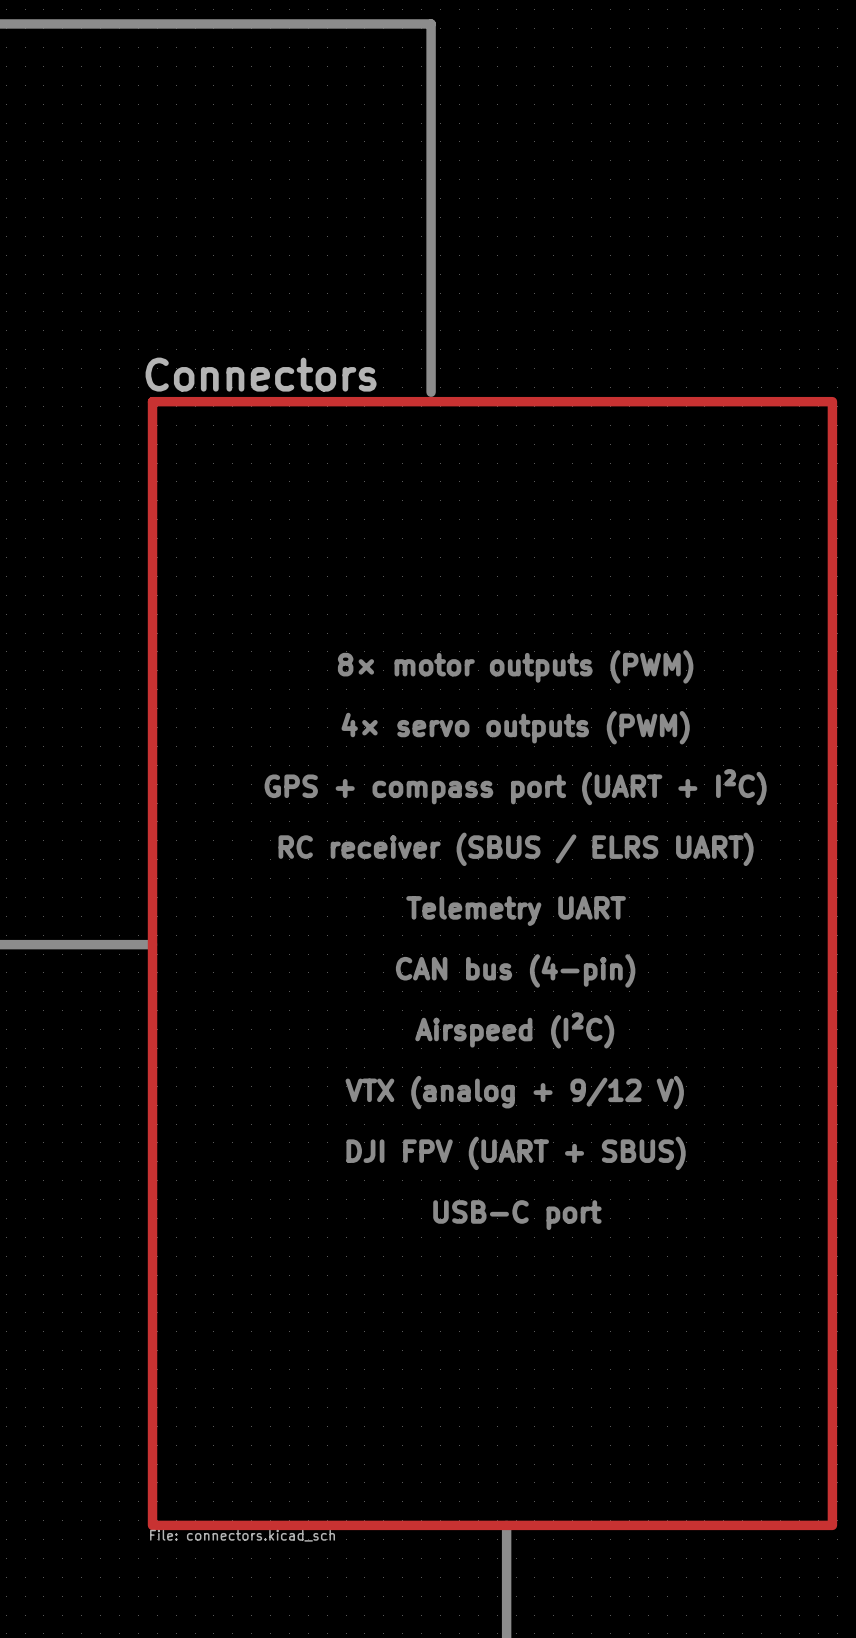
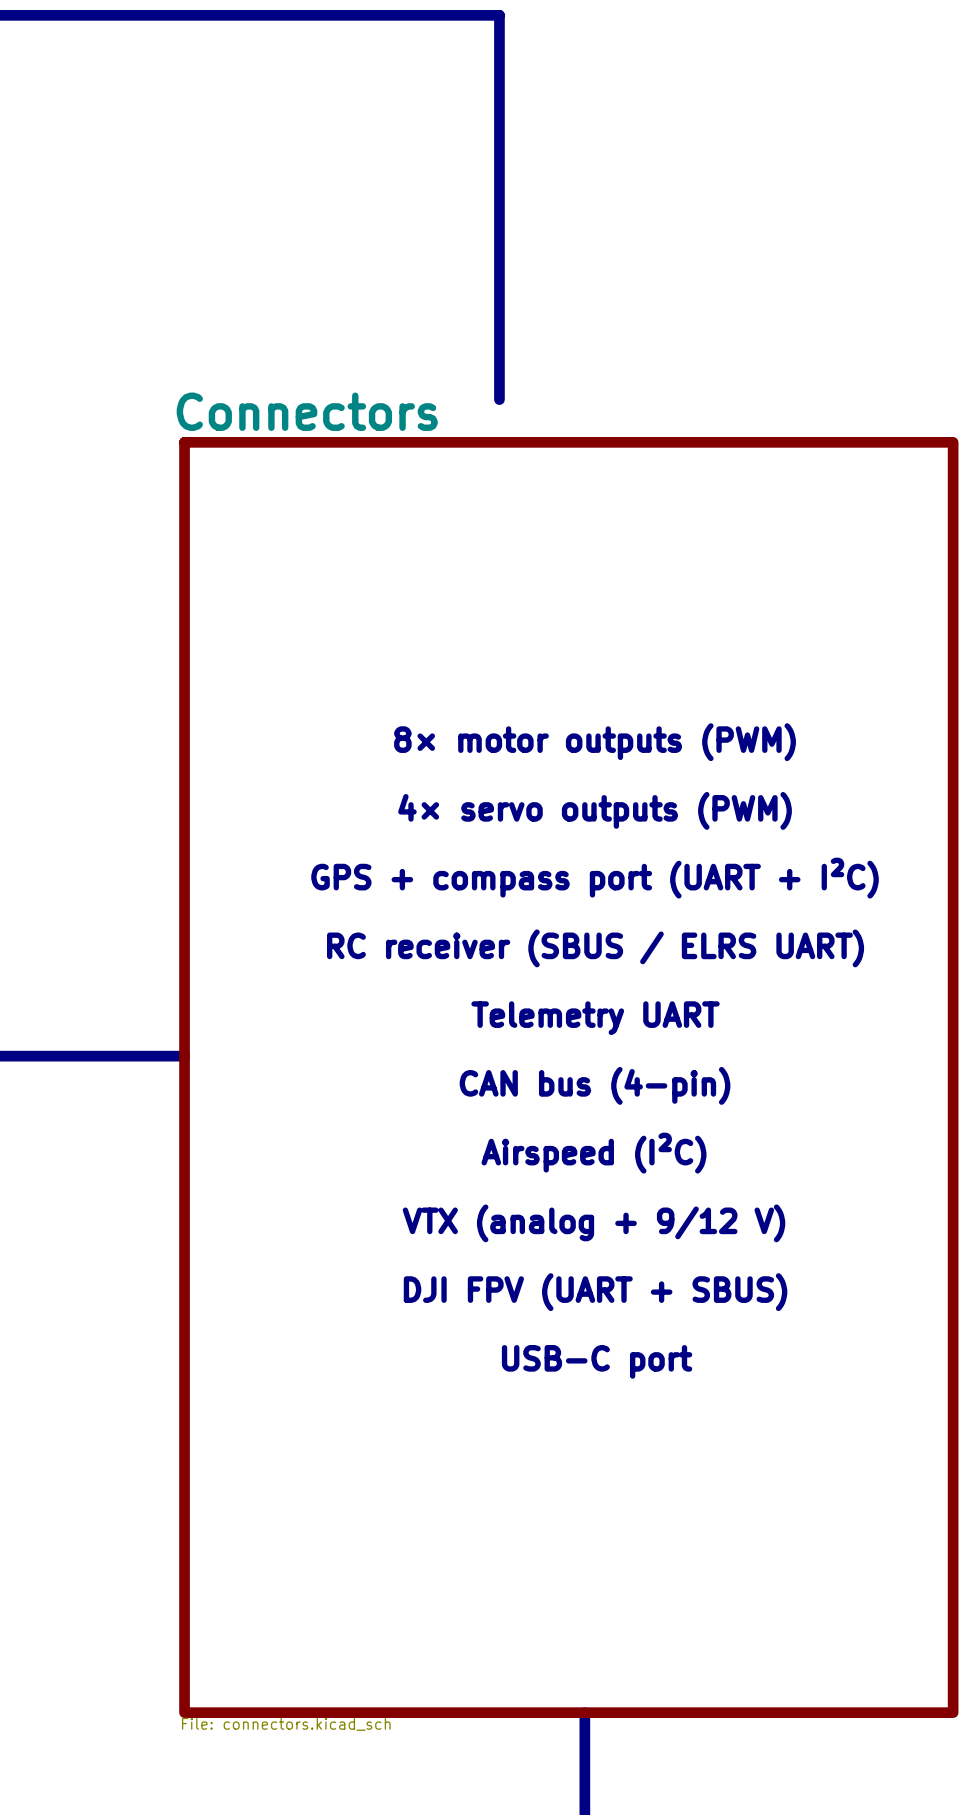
line: (431, 363) (431, 392) -> none

